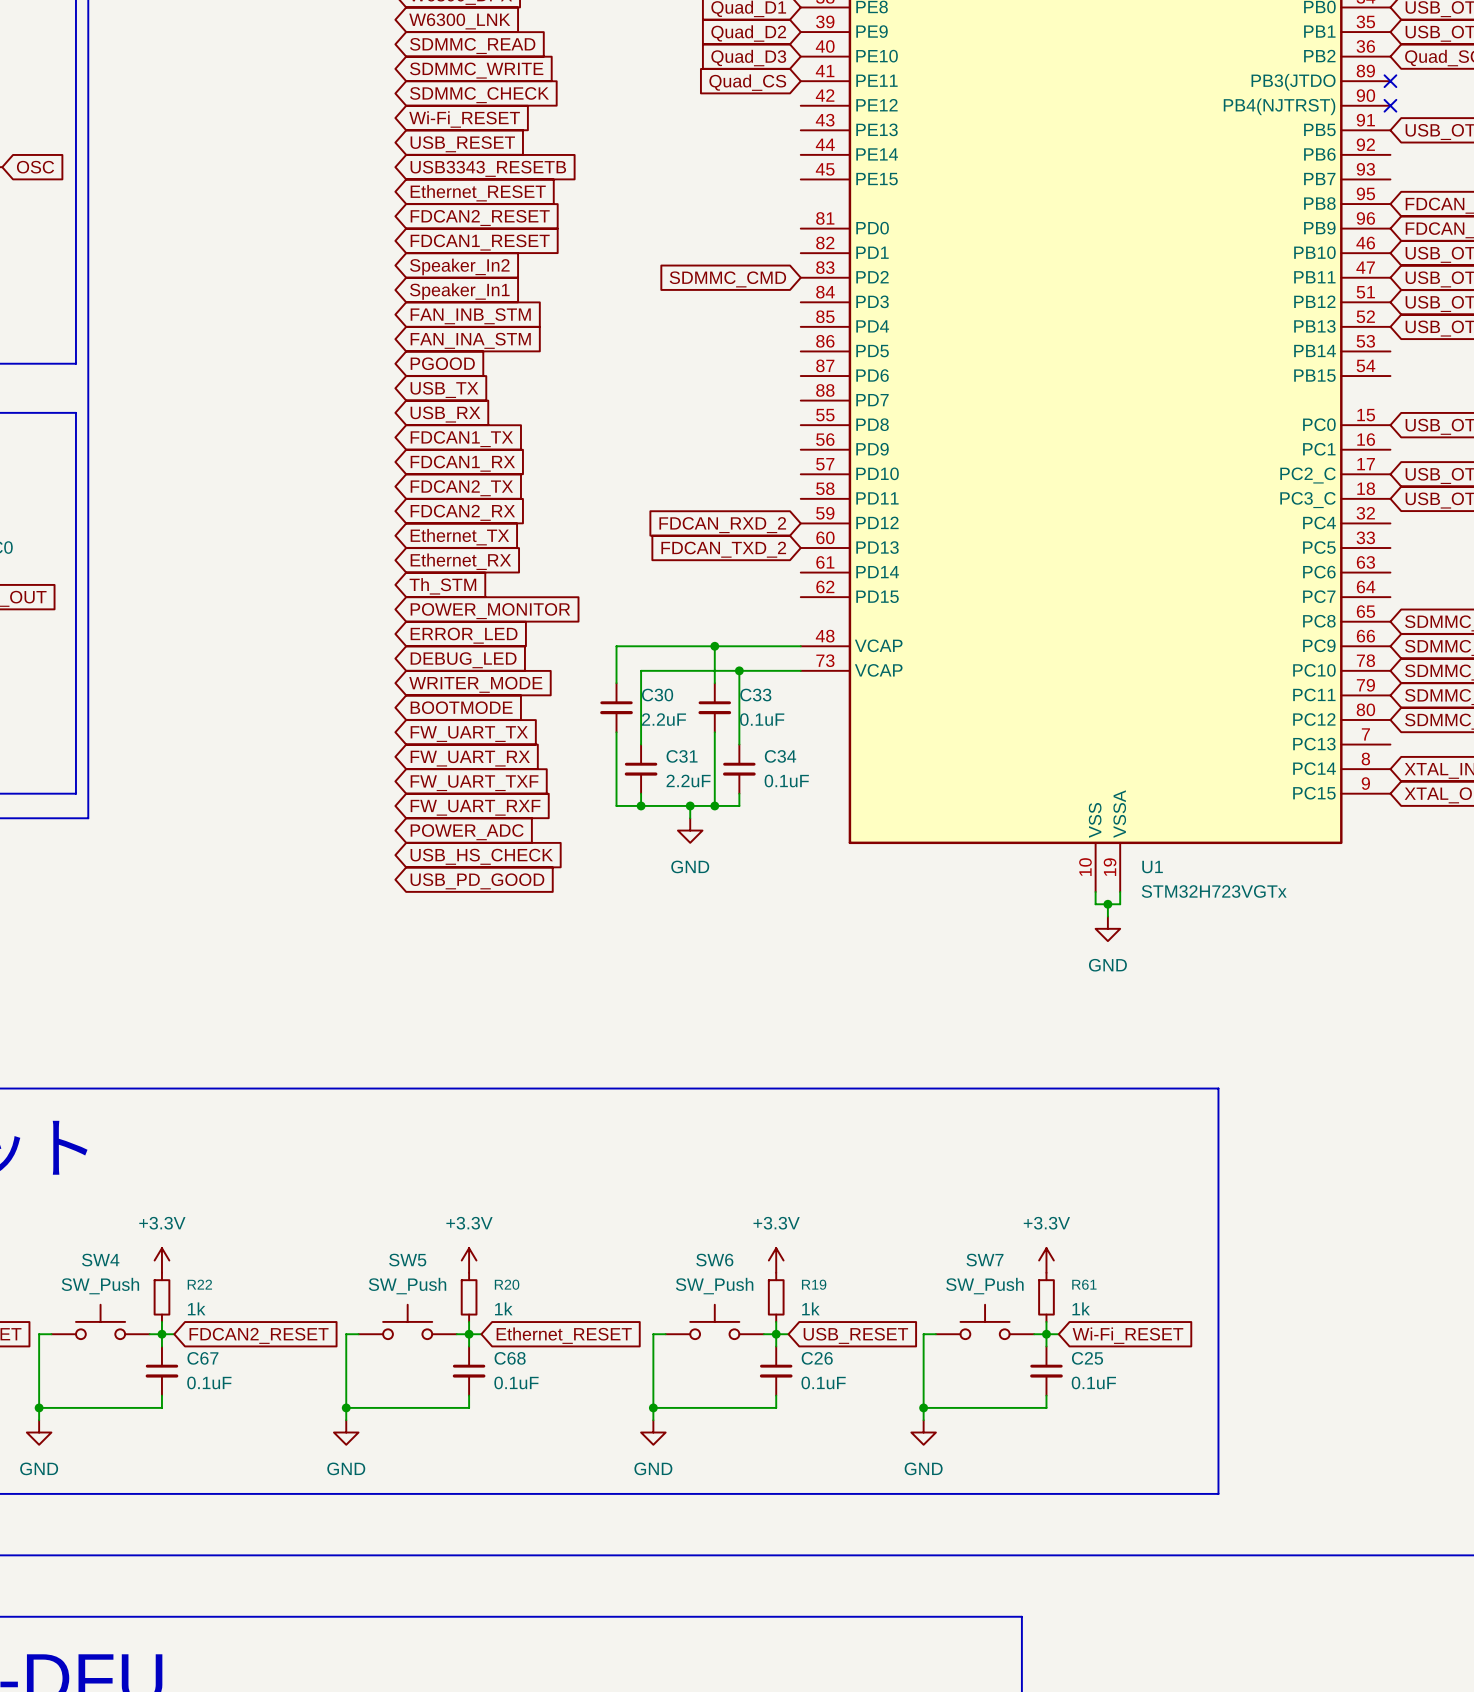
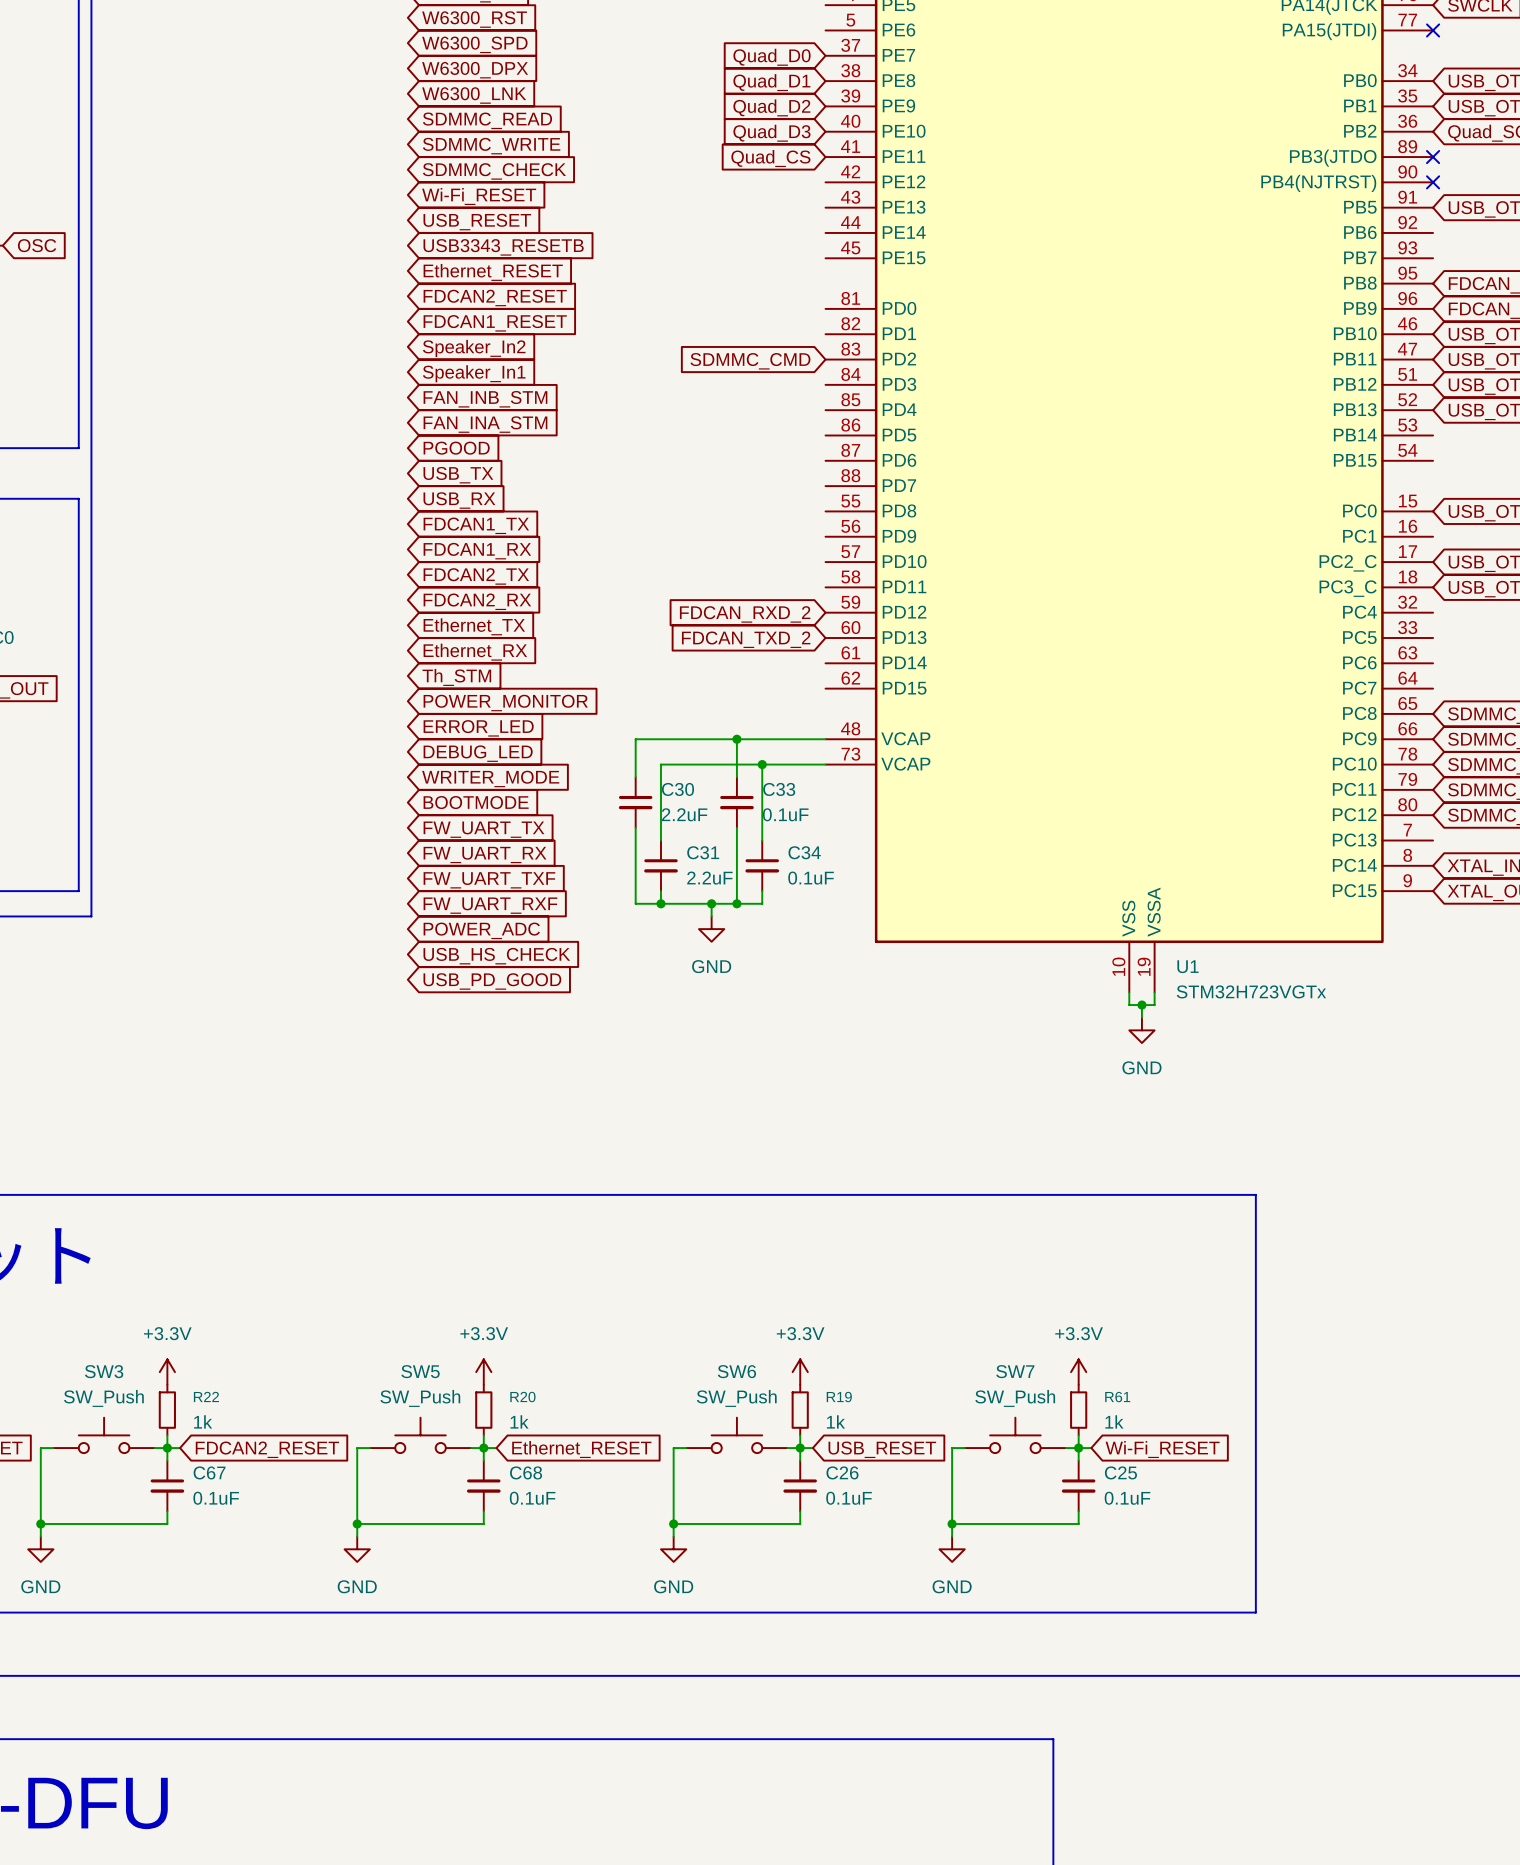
SW4 name: SW4 (100, 1260) -> SW3 (104, 1371)

